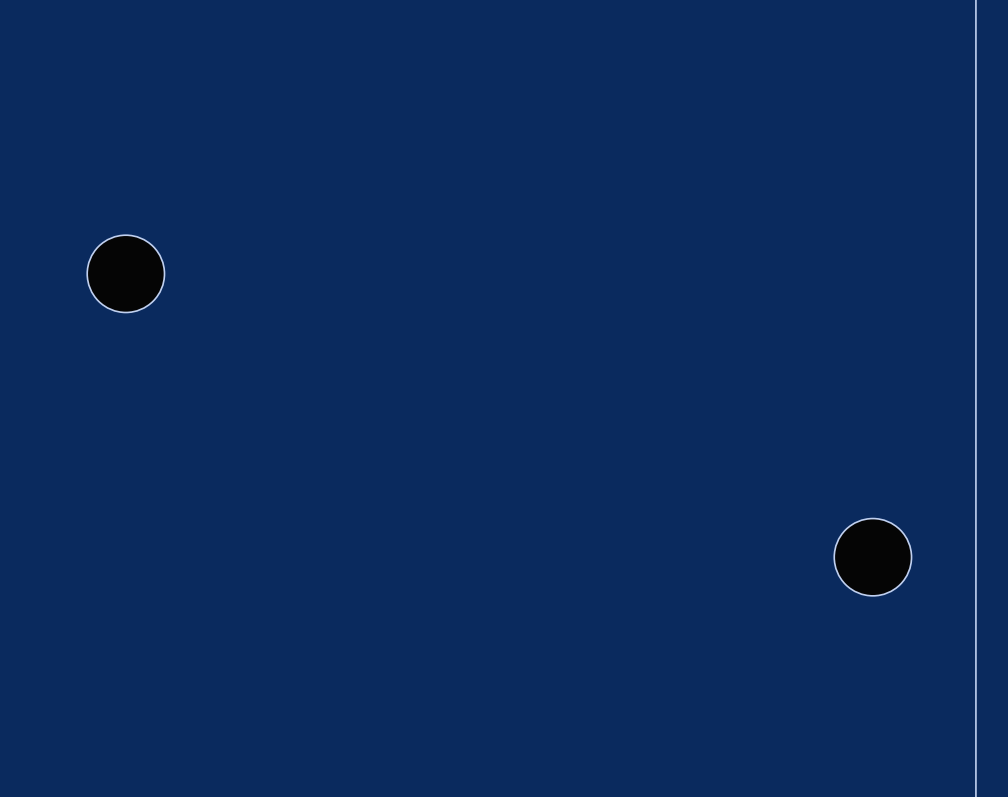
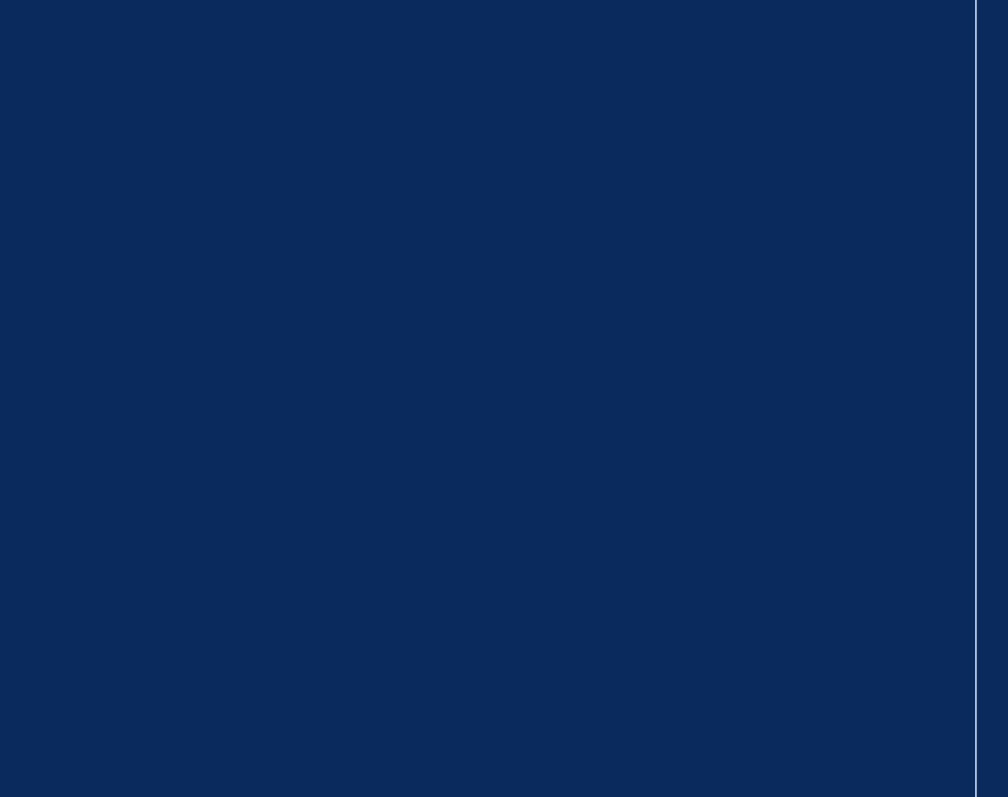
hole: (125, 273) -> none
hole: (872, 557) -> none

